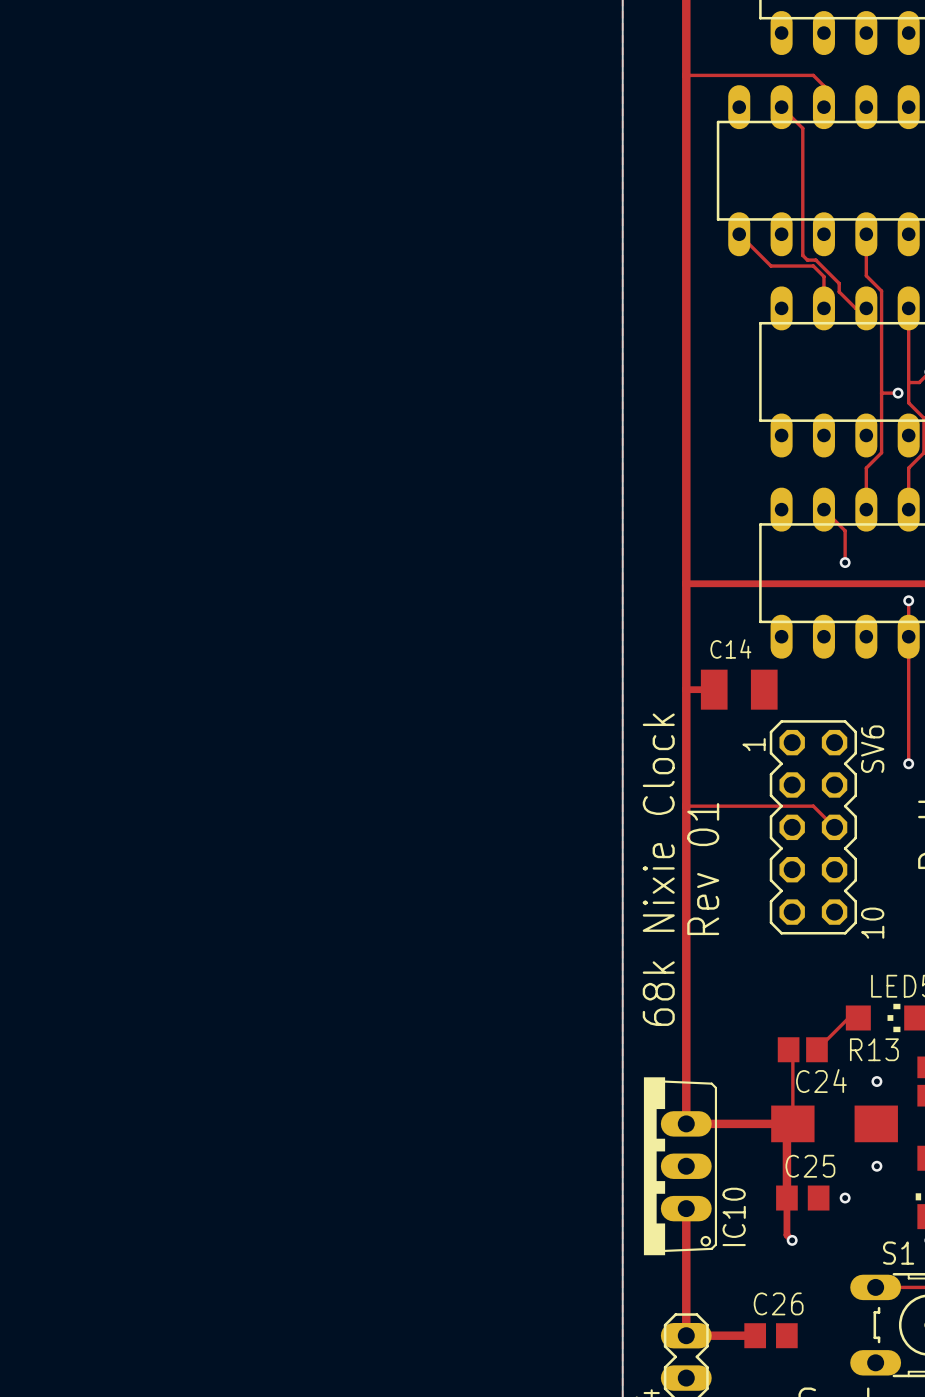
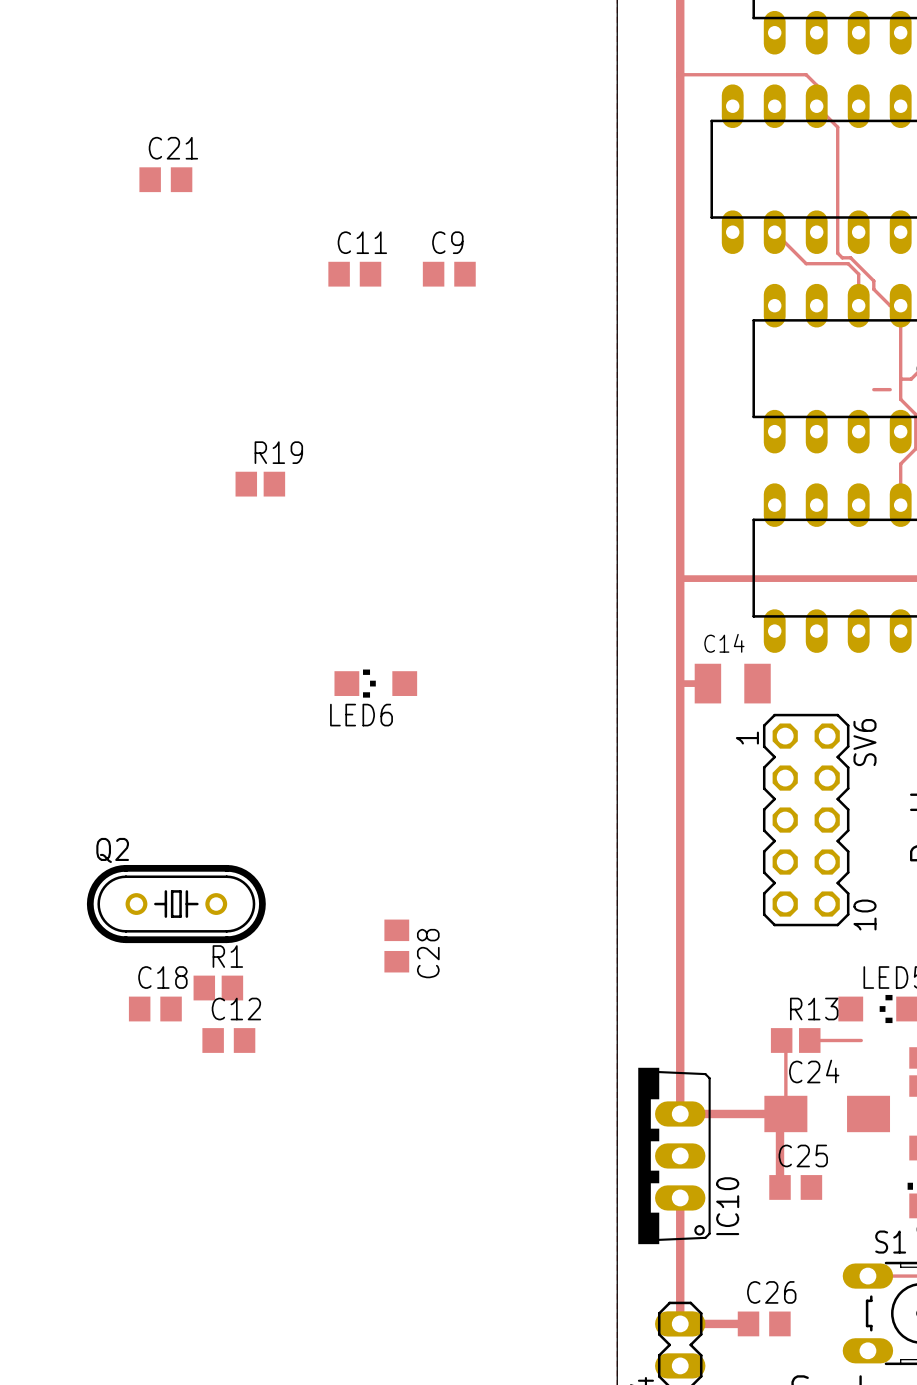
track: (781, 107) (802, 128) (802, 255) -> (774, 232) (795, 253)
C21: none -> (165, 179)
track: (739, 234) (771, 266) (813, 266) (823, 276) (823, 308) -> none
track: (866, 234) (866, 275) (881, 291) -> (816, 106) (837, 127) (837, 253) (842, 257) (850, 257) (873, 280) (873, 288)
track: (807, 260) (815, 260) (839, 283) (839, 291) (855, 308) (866, 308) -> (800, 257) (806, 263) (848, 263) (858, 274) (858, 305)
C11: none -> (354, 274)
C9: none -> (449, 274)
track: (881, 291) (881, 452) (866, 468) (866, 509) -> (873, 289) (890, 305) (900, 305)
via: (898, 393) -> none
R19: none -> (260, 484)
track: (823, 509) (845, 530) (845, 562) -> none
via: (845, 562) -> none
track: (908, 600) (908, 763) -> none
via: (908, 600) -> none
LED6: none -> (375, 683)
via: (908, 763) -> none
track: (686, 806) (813, 806) (834, 827) -> none
text: 68k Nixie Clock (658, 869) -> none
text: Rev 01 (703, 869) -> none
Q2: none -> (176, 904)
C28: none -> (396, 946)
R1: none -> (218, 988)
C18: none -> (155, 1009)
track: (858, 1017) (848, 1017) (816, 1049) -> (861, 1040) (809, 1040)
C12: none -> (228, 1040)
R13 name position: R13 (874, 1049) -> R13 (814, 1009)
via: (876, 1081) -> none
via: (876, 1166) -> none
track: (786, 1198) (786, 1235) (792, 1240) -> none
via: (845, 1198) -> none
via: (792, 1240) -> none

